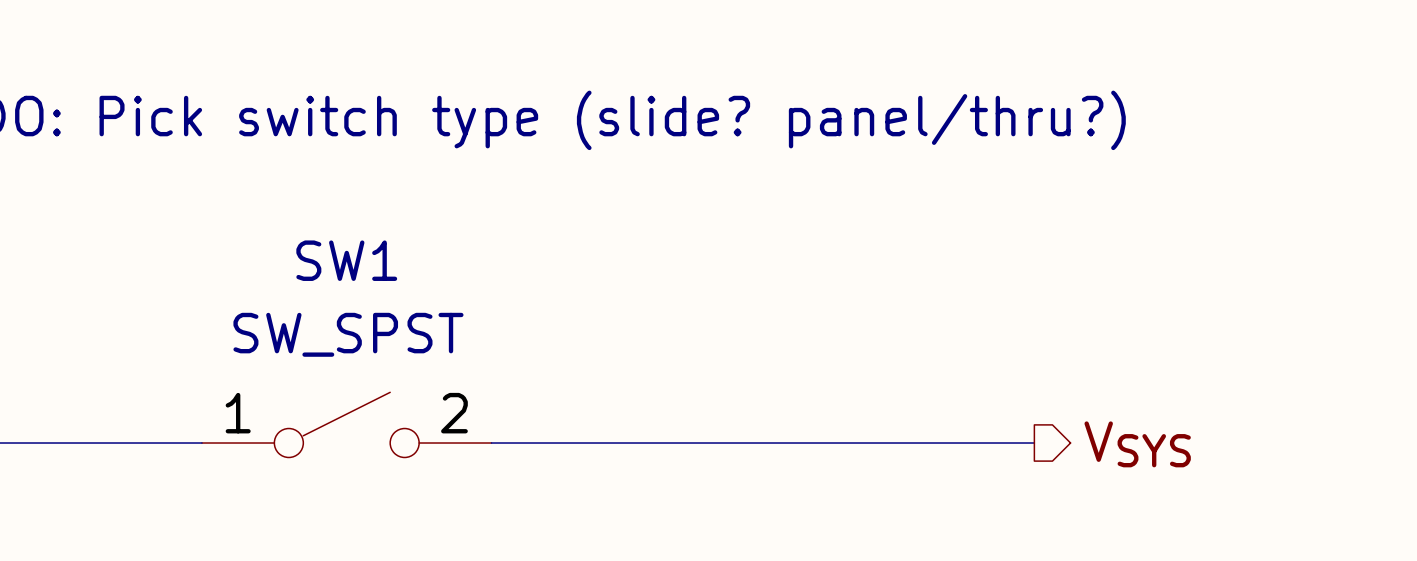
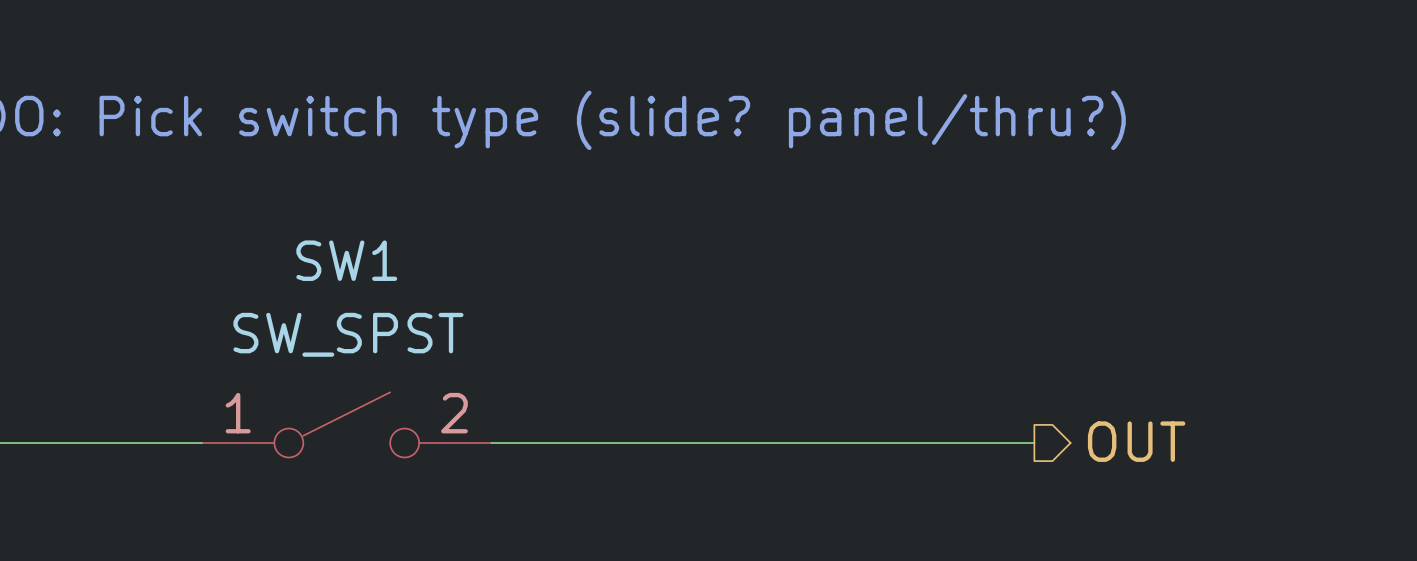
hierarchical label: VSYS (1137, 444) -> OUT (1136, 441)

